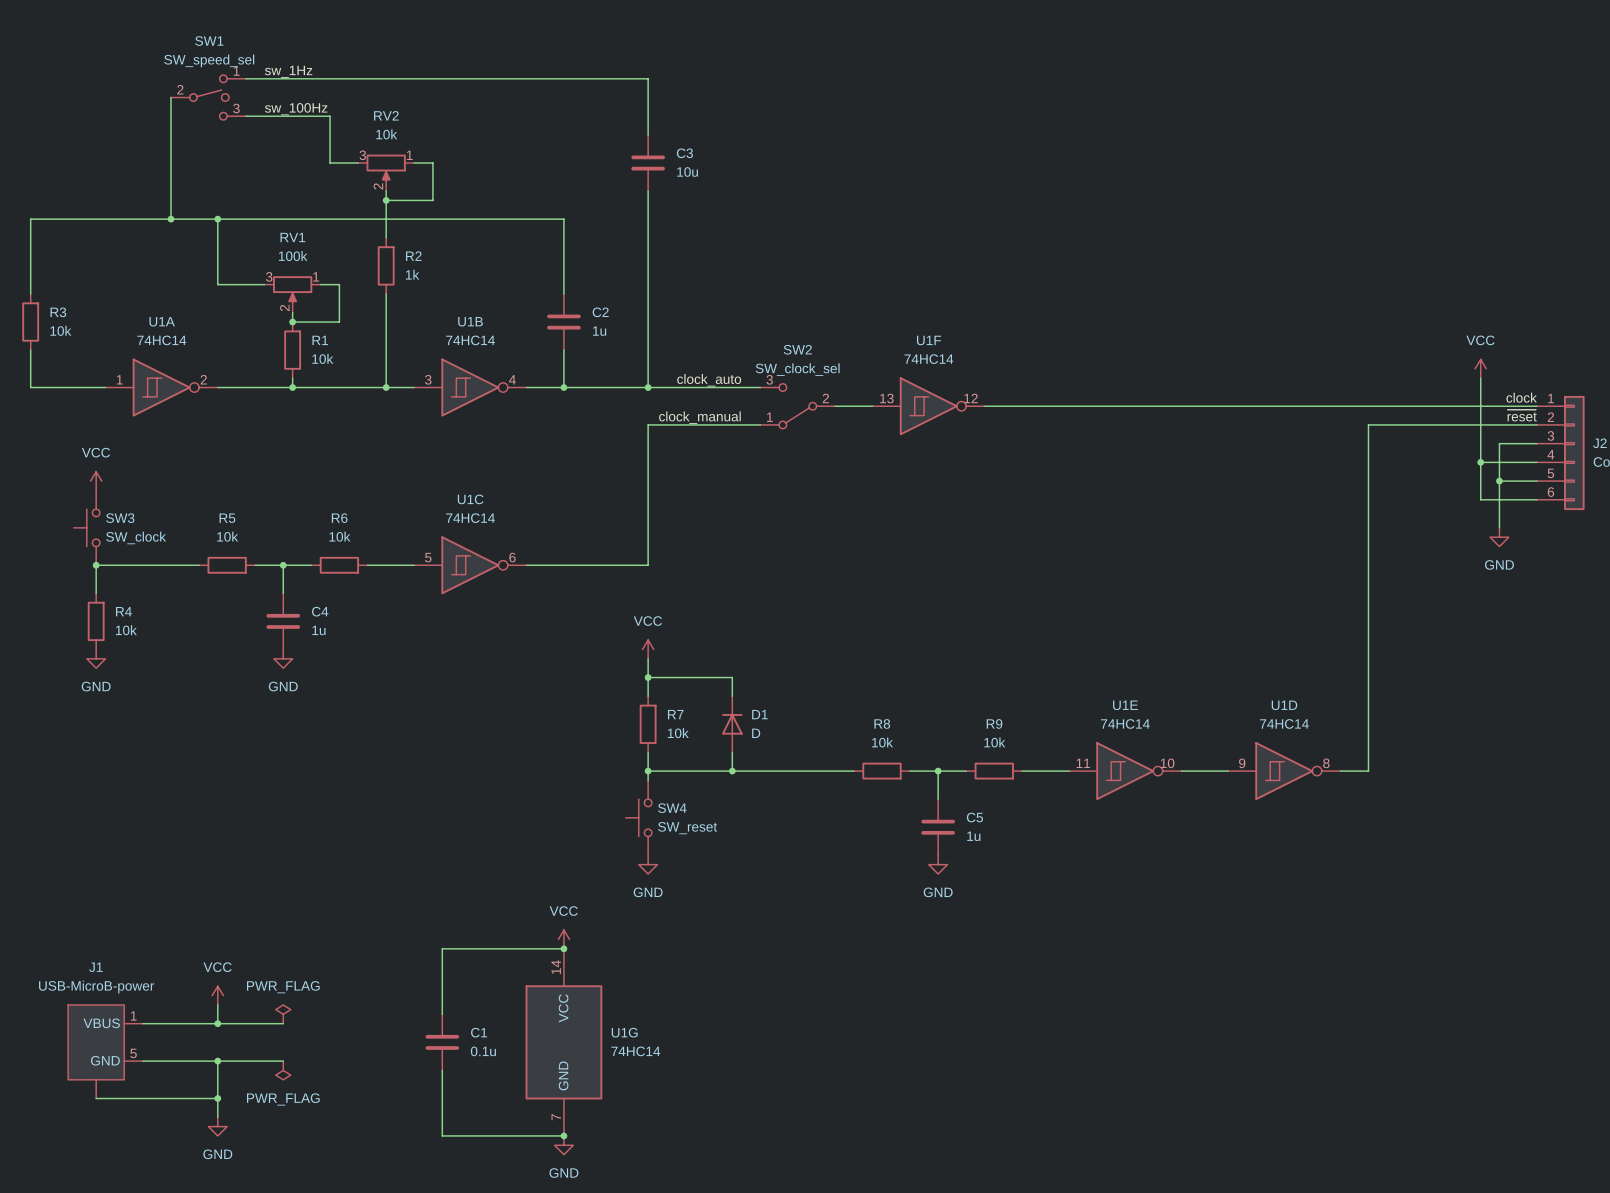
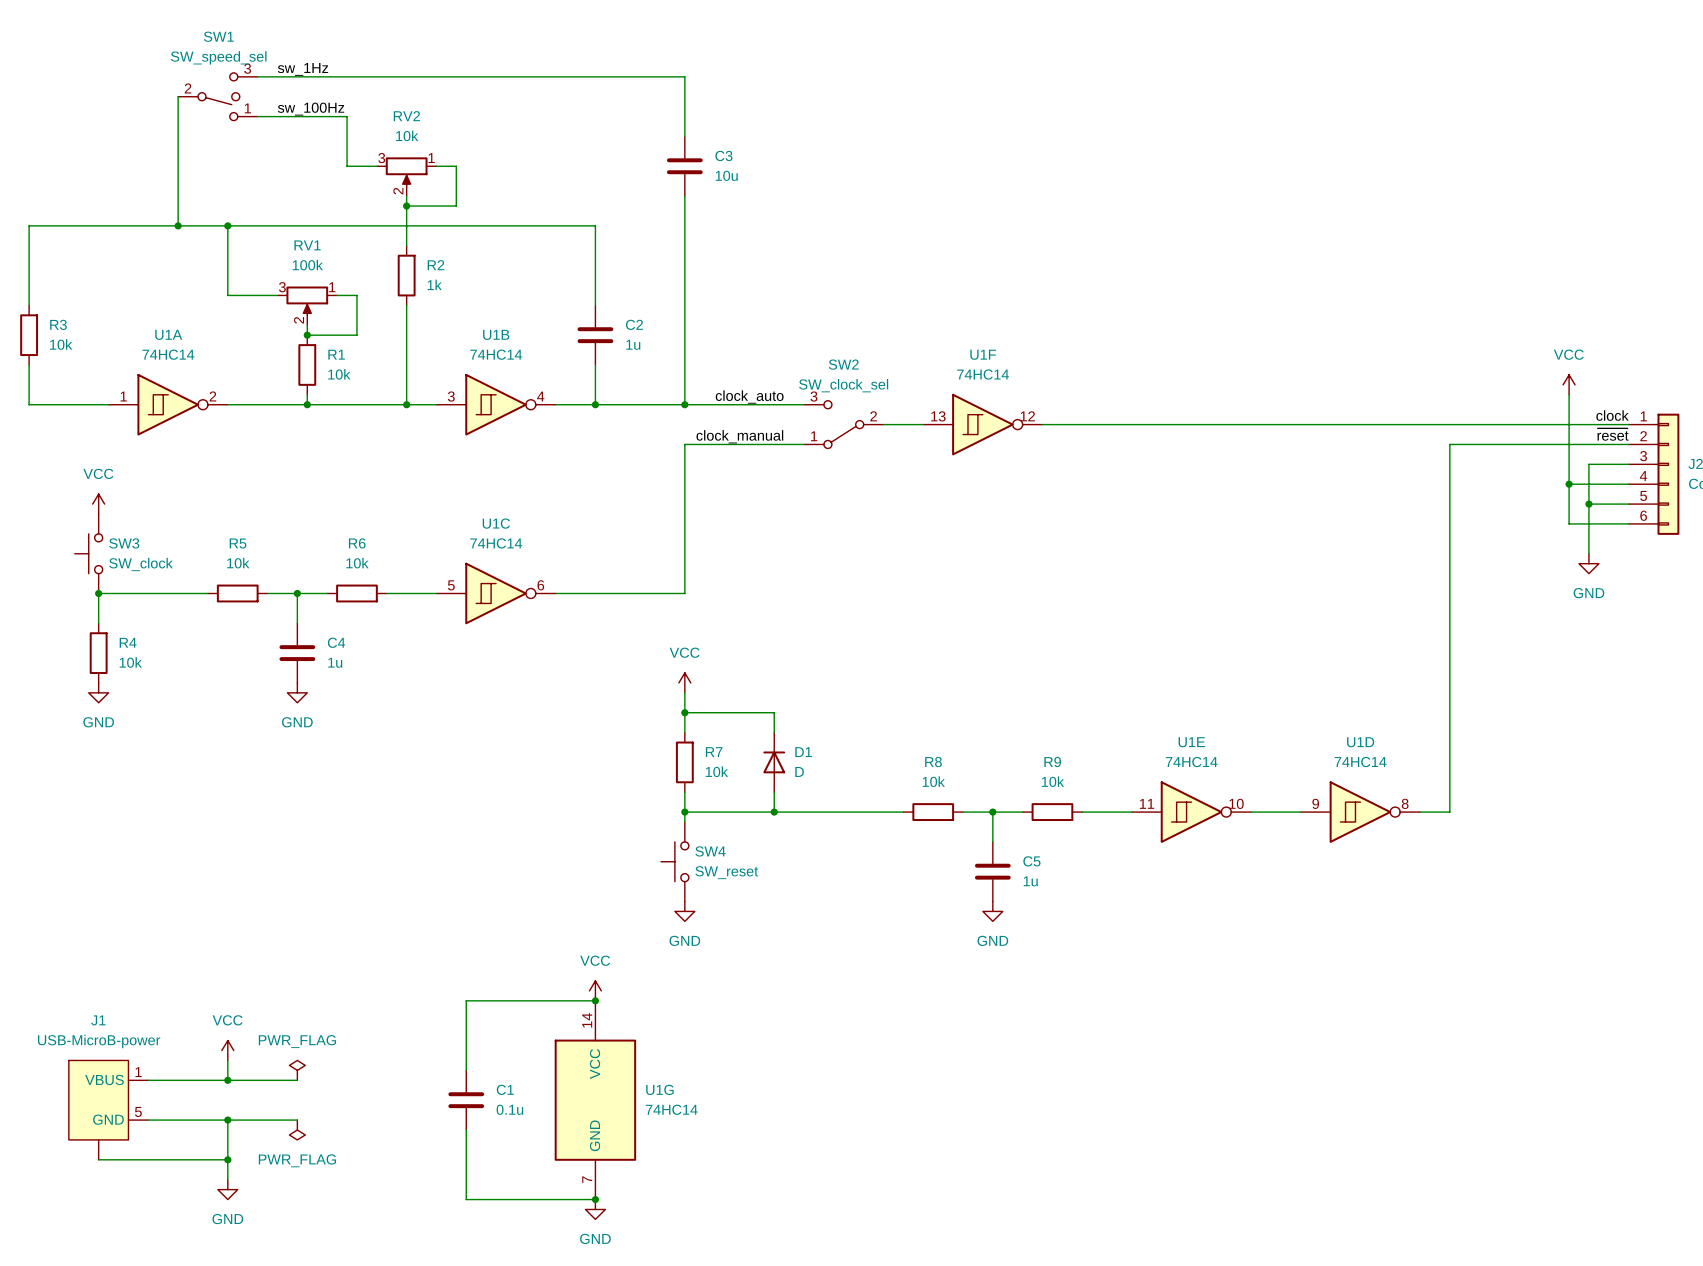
SW1 flip: as is (209, 97) -> up-down (218, 96)

